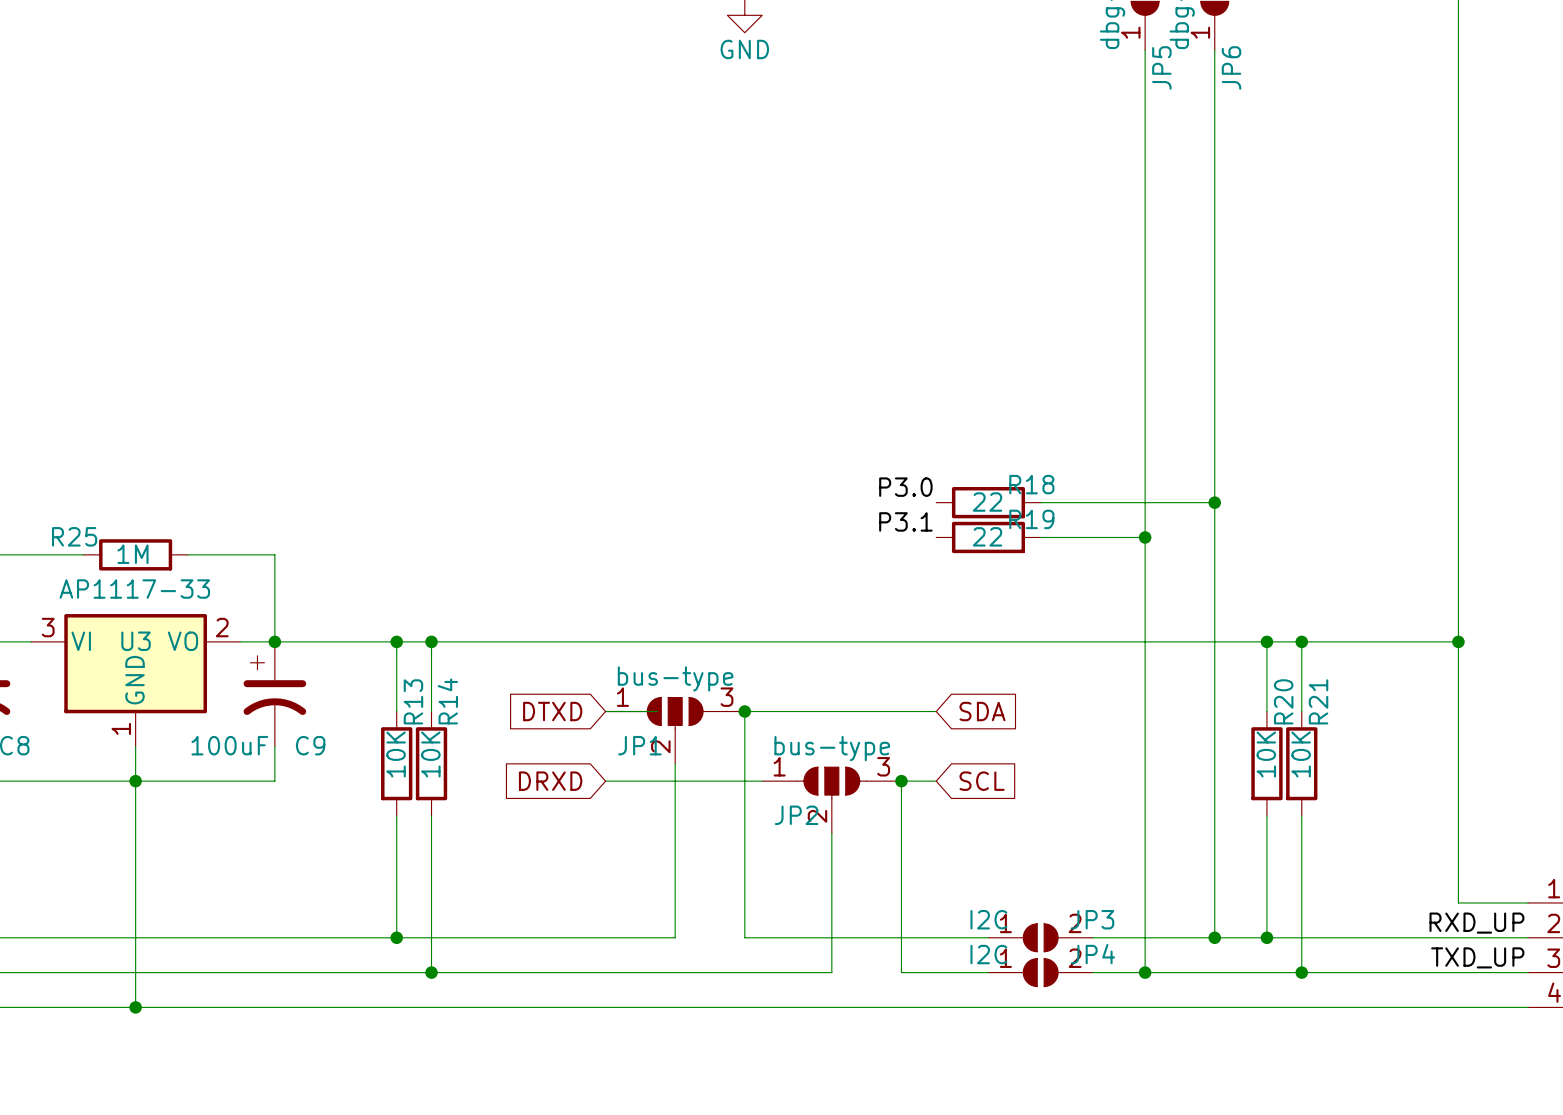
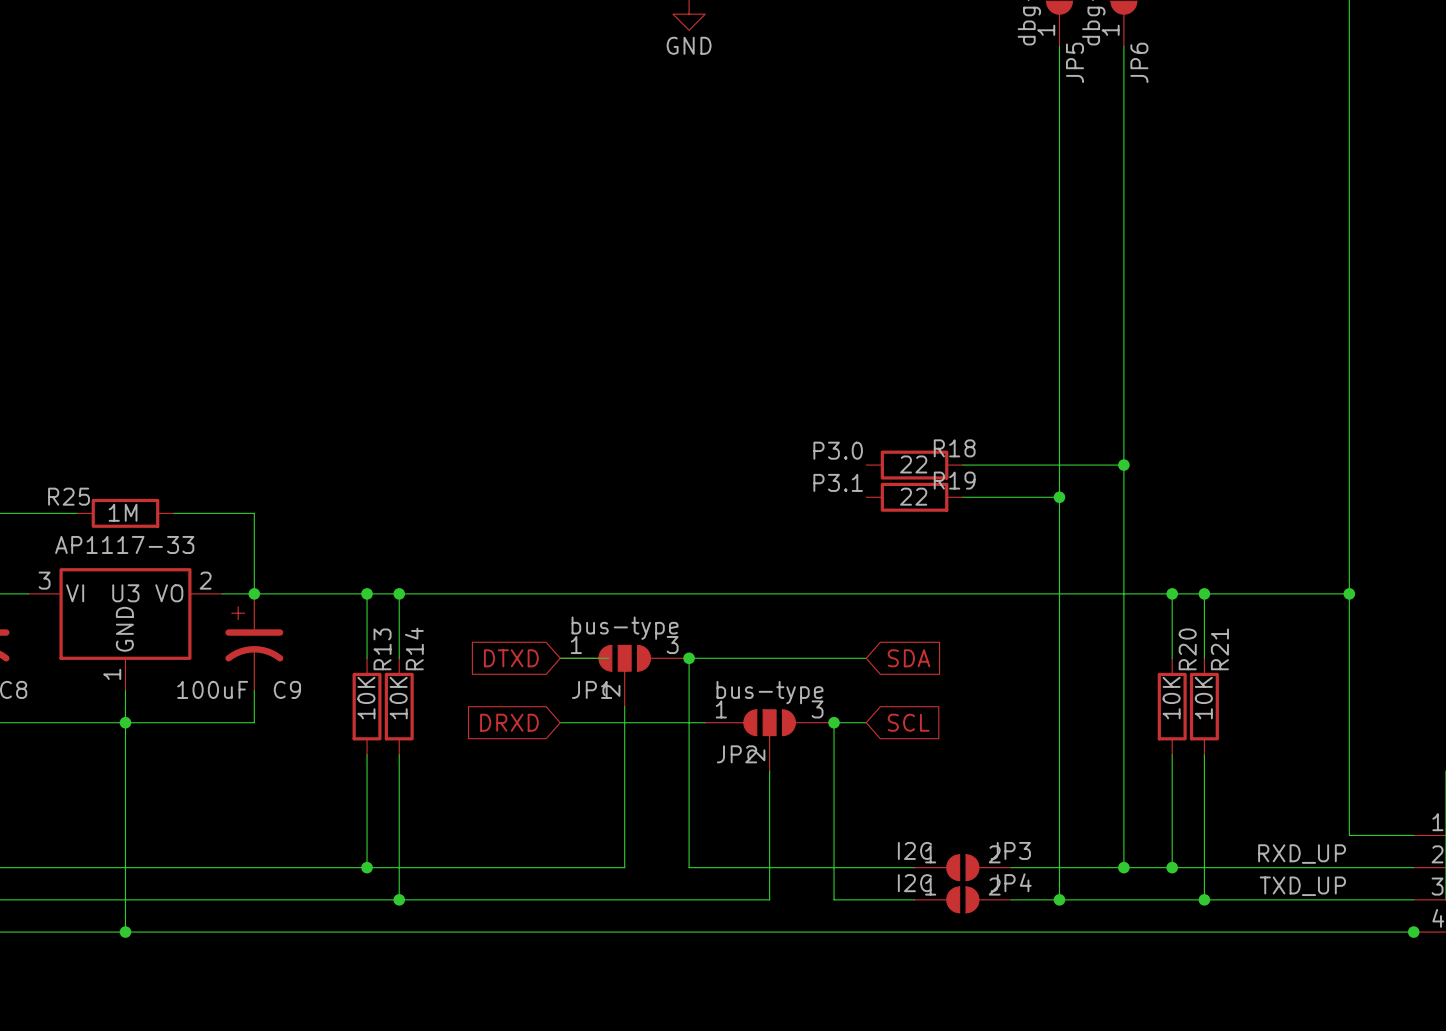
wire: none -> (1445, 771) (1445, 899)
label position: RXD_UP (1476, 923) -> RXD_UP (1302, 854)
label position: TXD_UP (1477, 957) -> TXD_UP (1302, 886)
junction: none -> (1413, 932)

